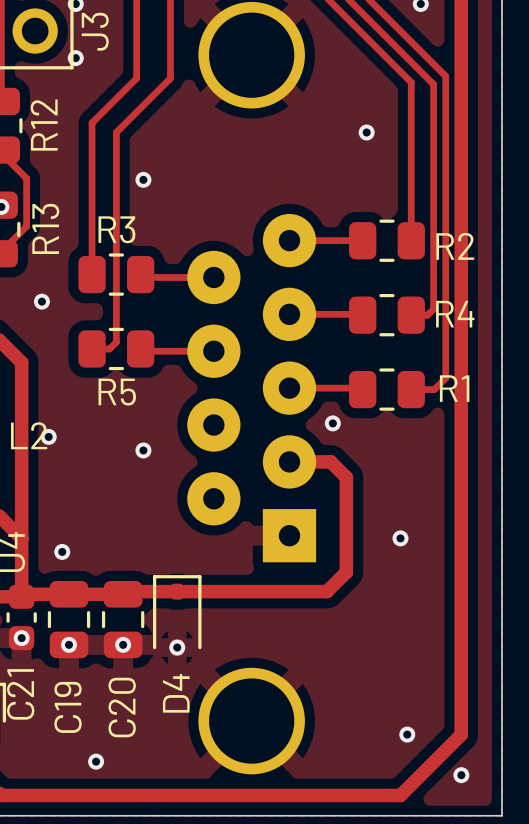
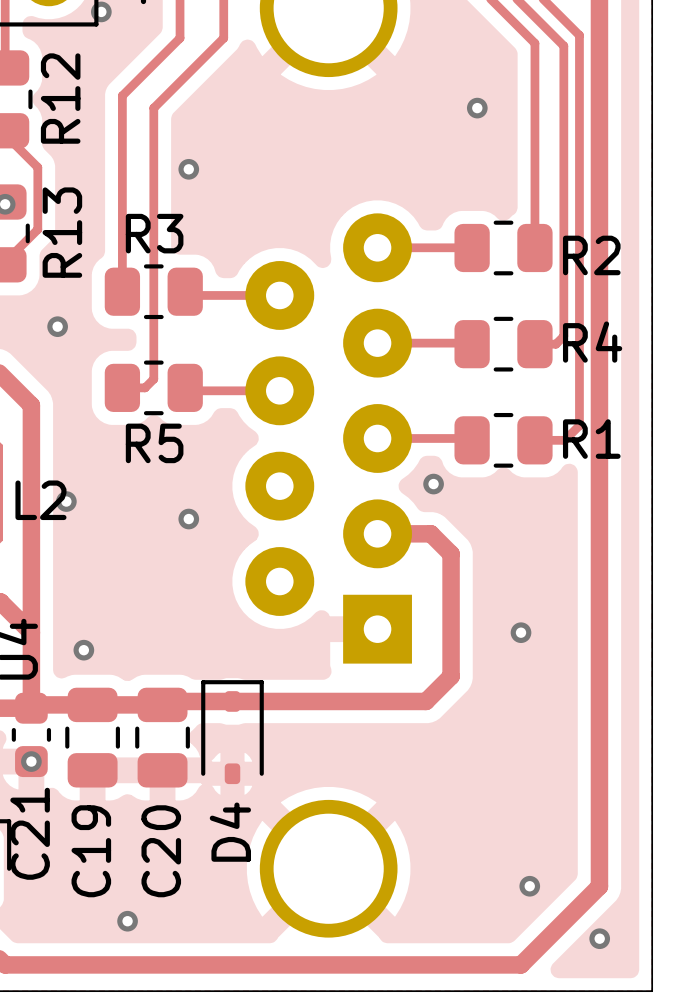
via: (69, 644) -> none
via: (123, 644) -> none
via: (177, 647) -> none

